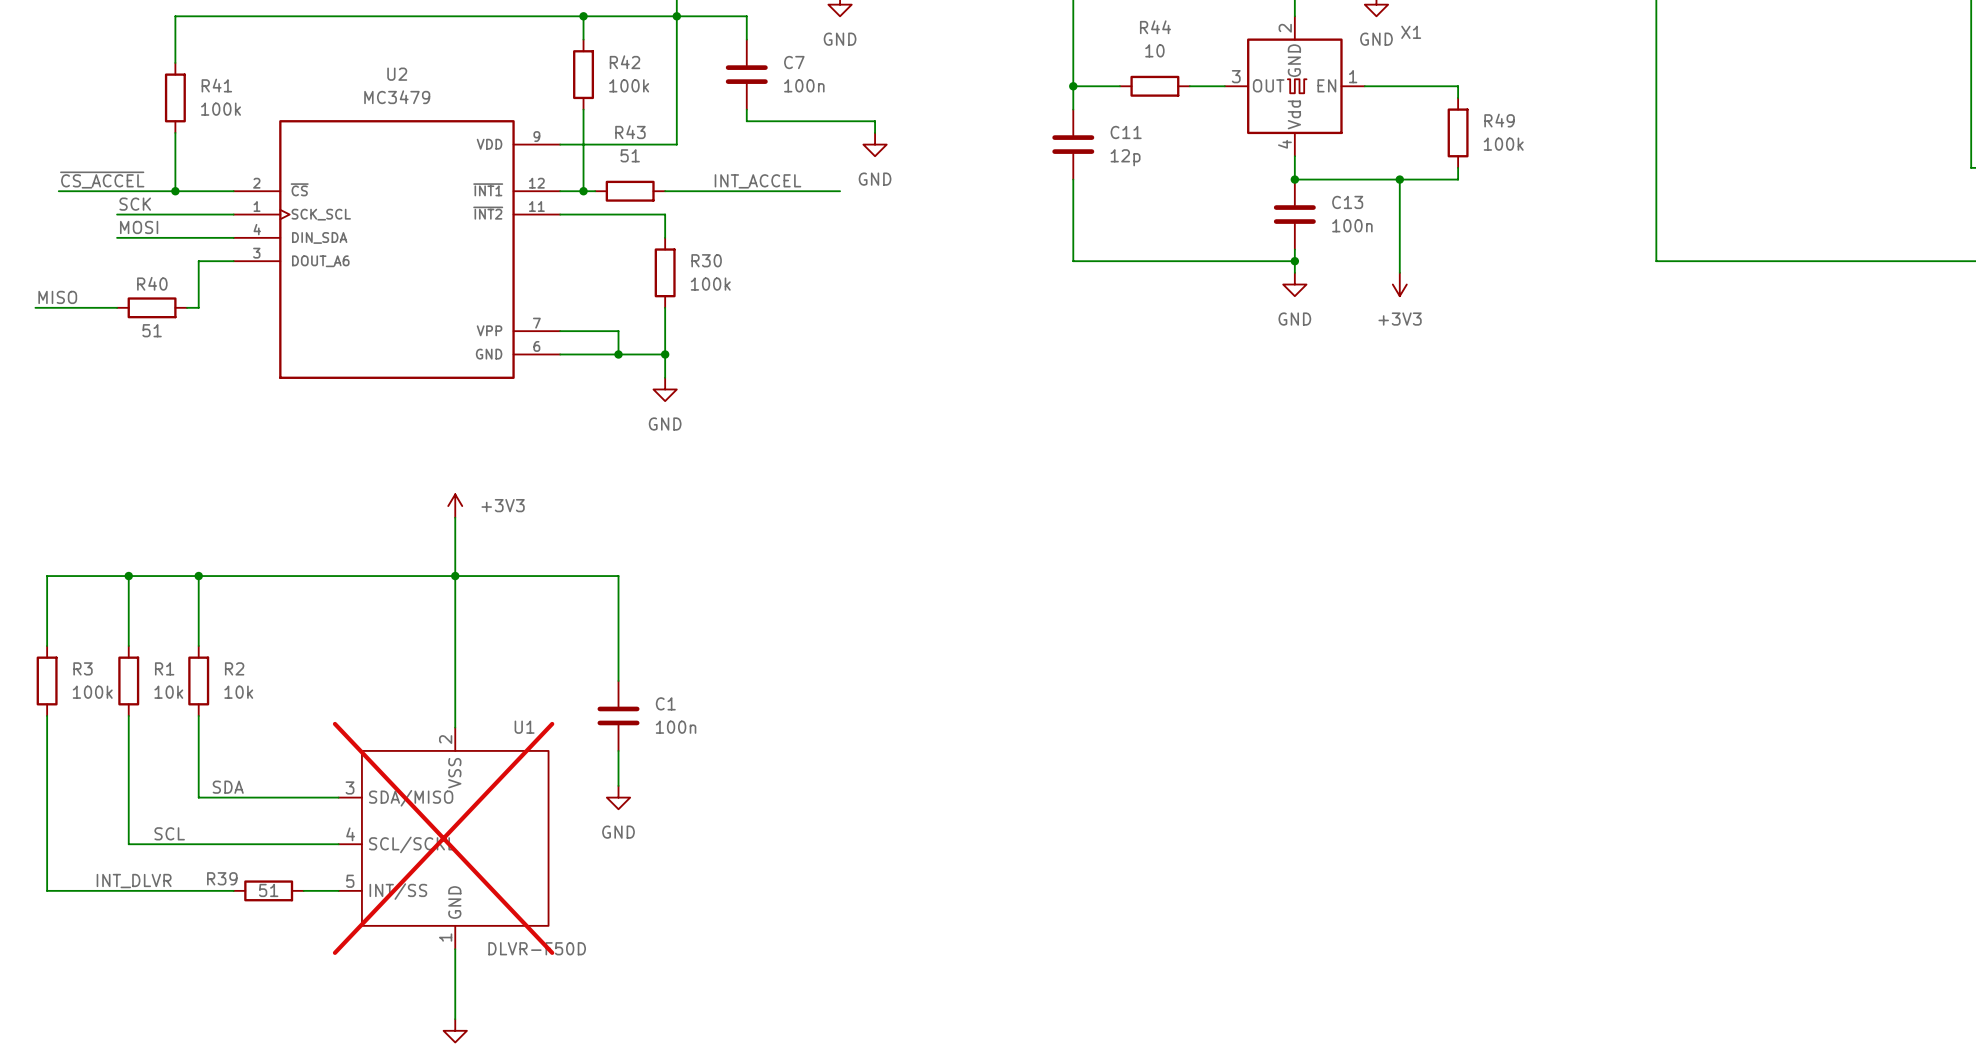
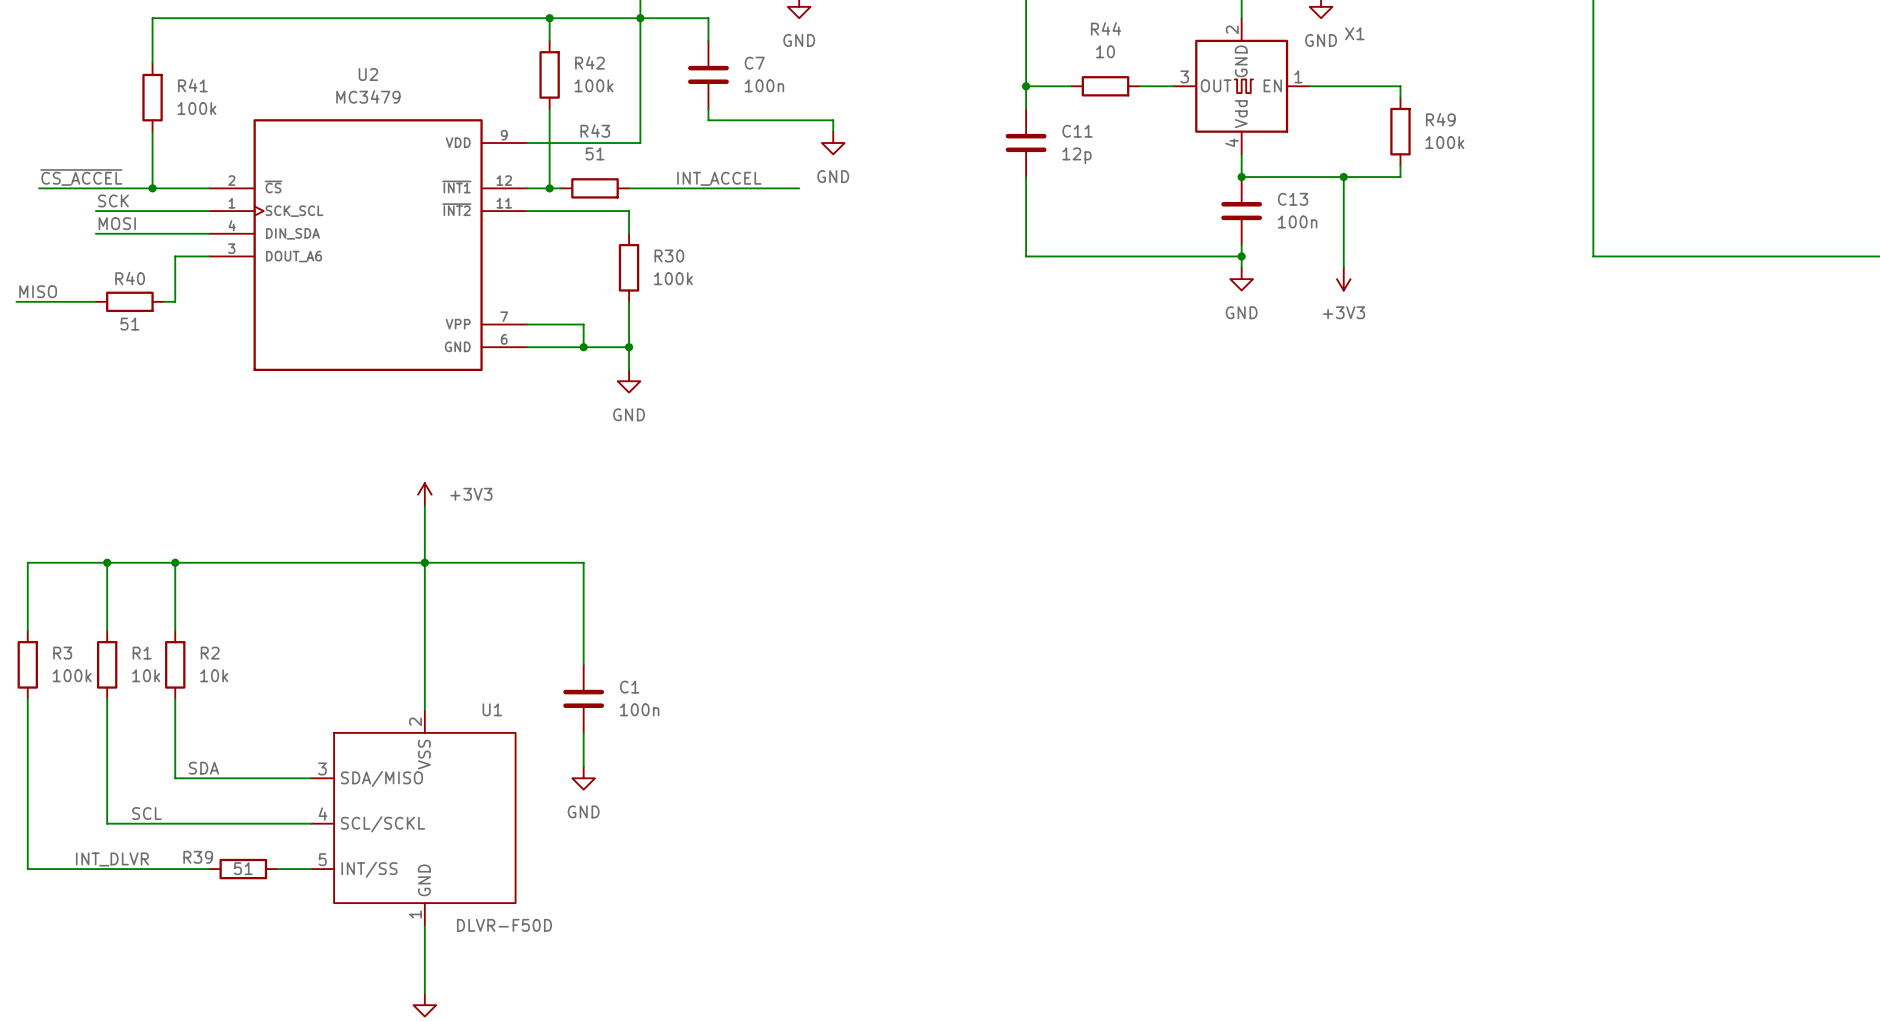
U1 do-not-place cross: (443, 838) -> none

